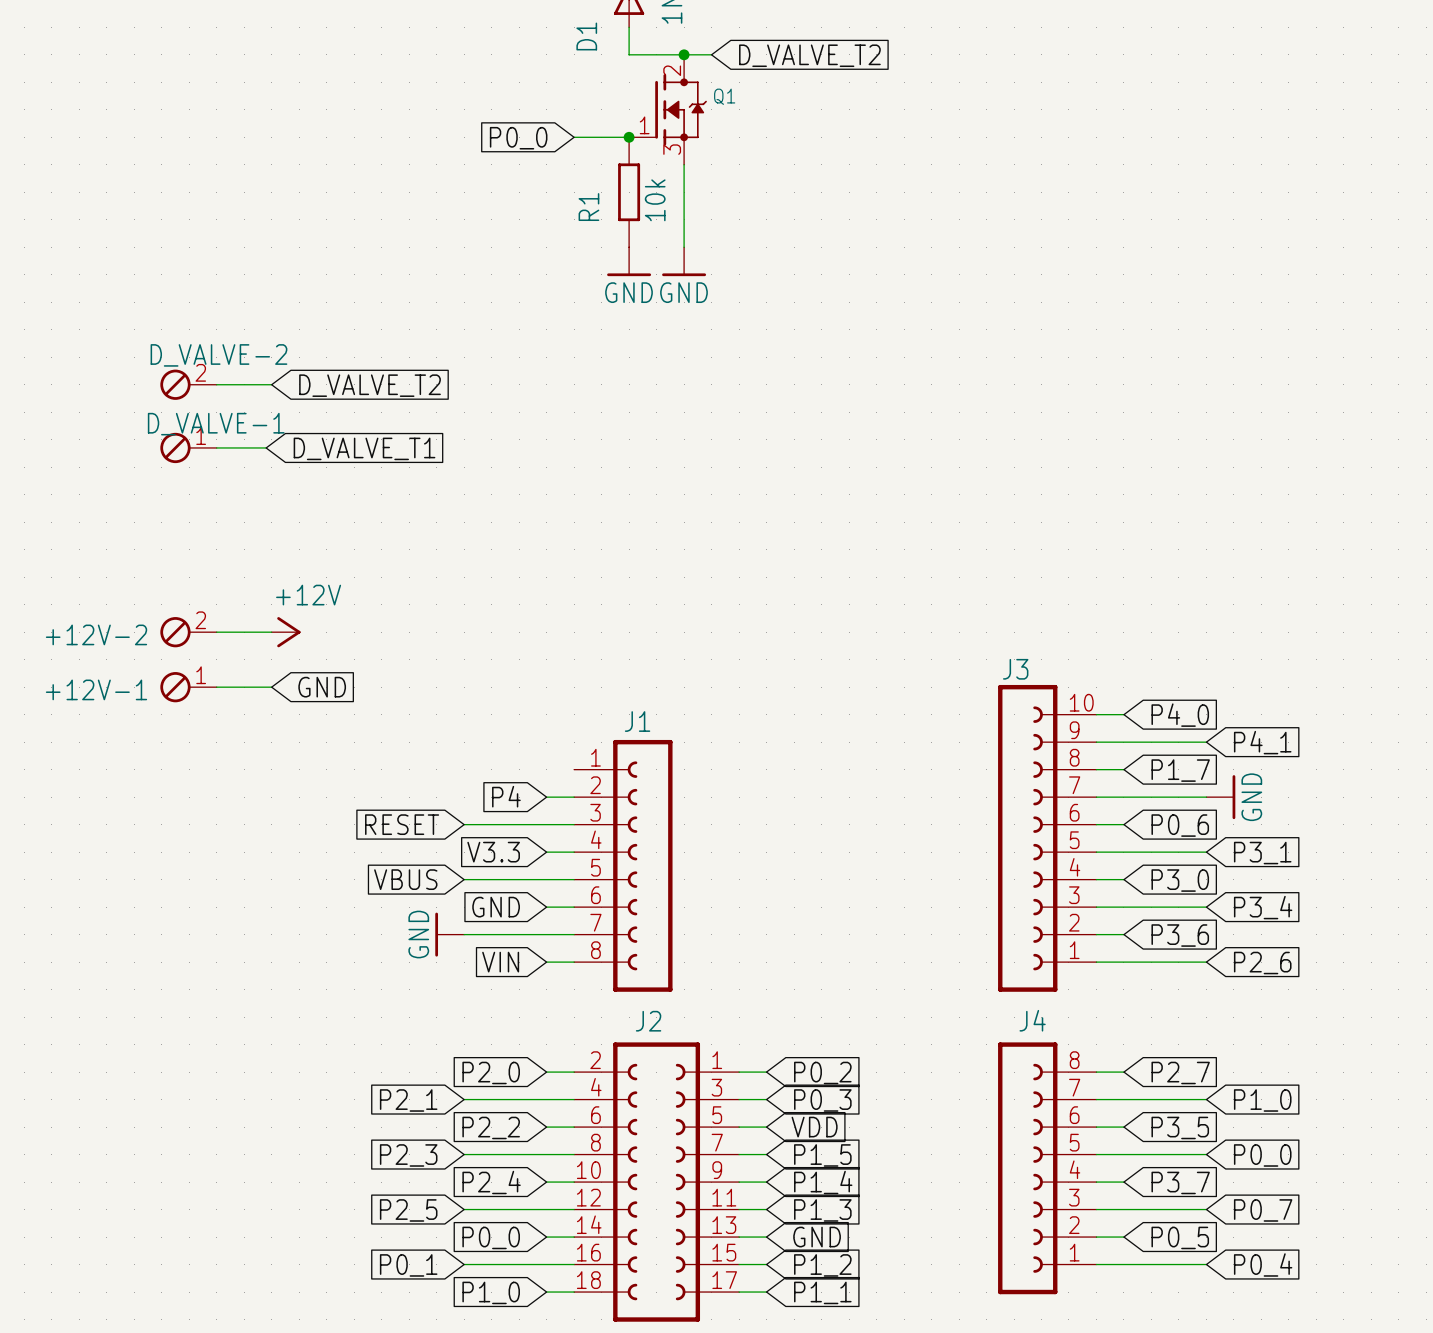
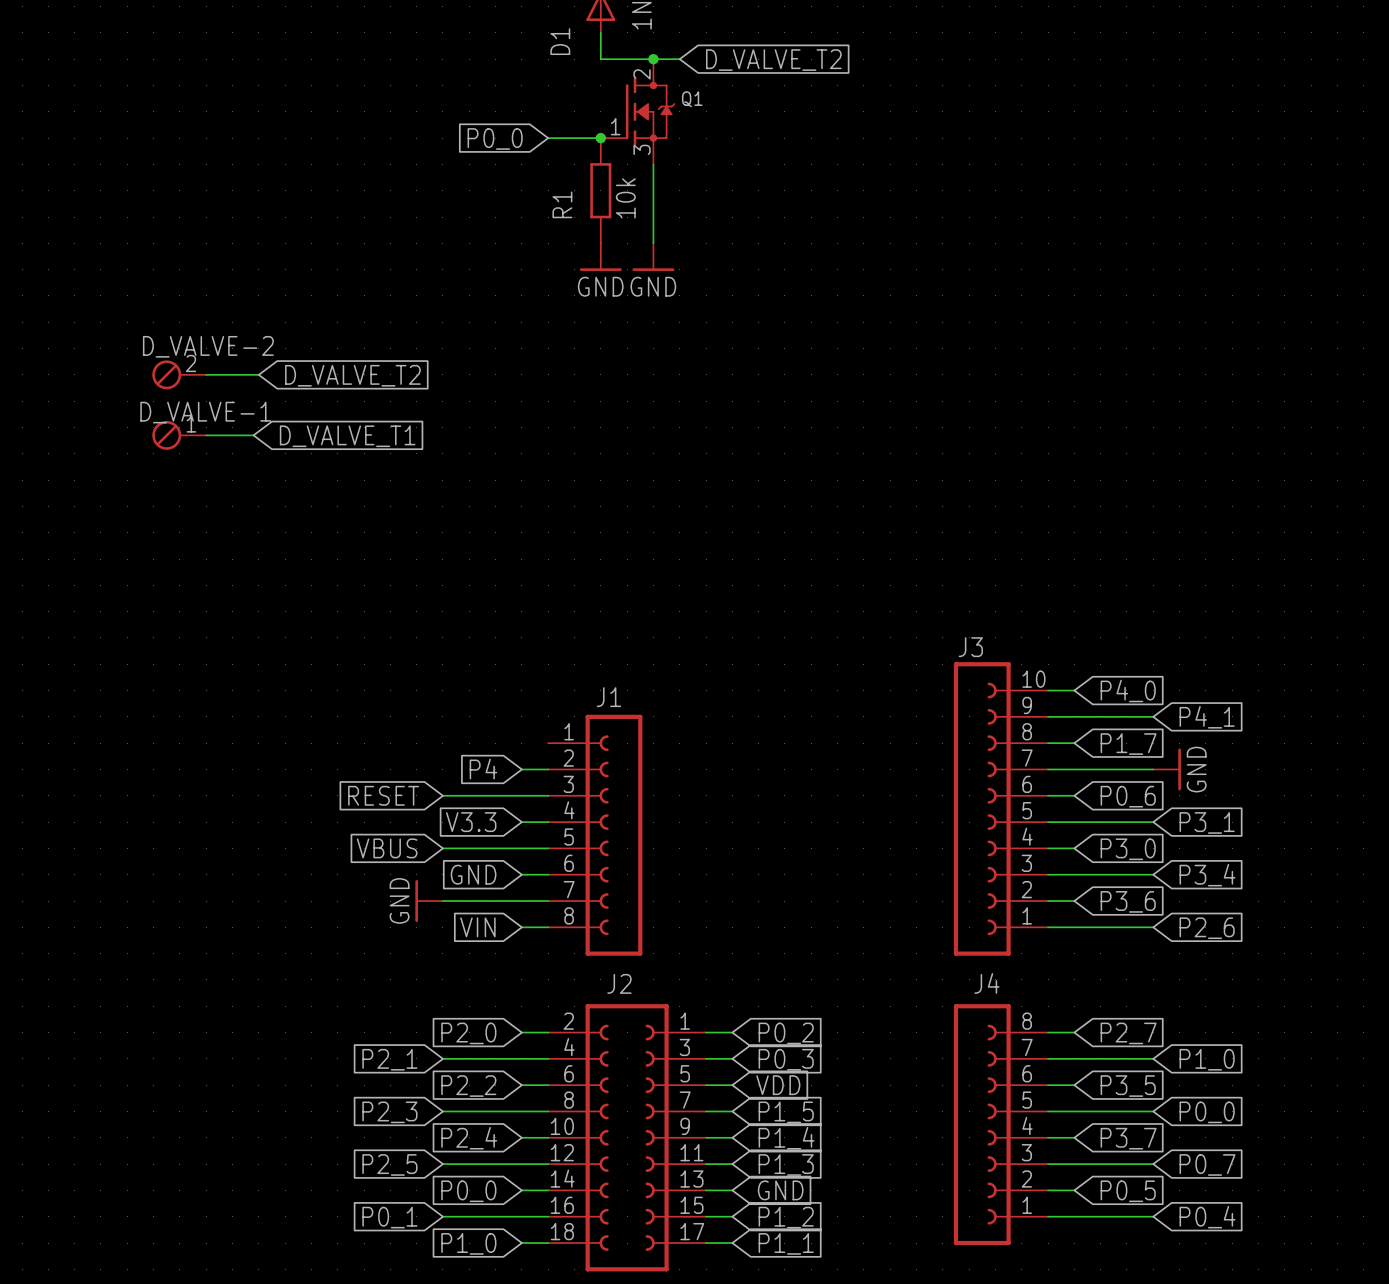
+12V-2: (188, 632) -> none
wire: (216, 632) (271, 632) -> none
power symbol: +12V (286, 632) -> none
+12V-1: (188, 687) -> none
wire: (216, 687) (271, 687) -> none
global label: GND (322, 687) -> none

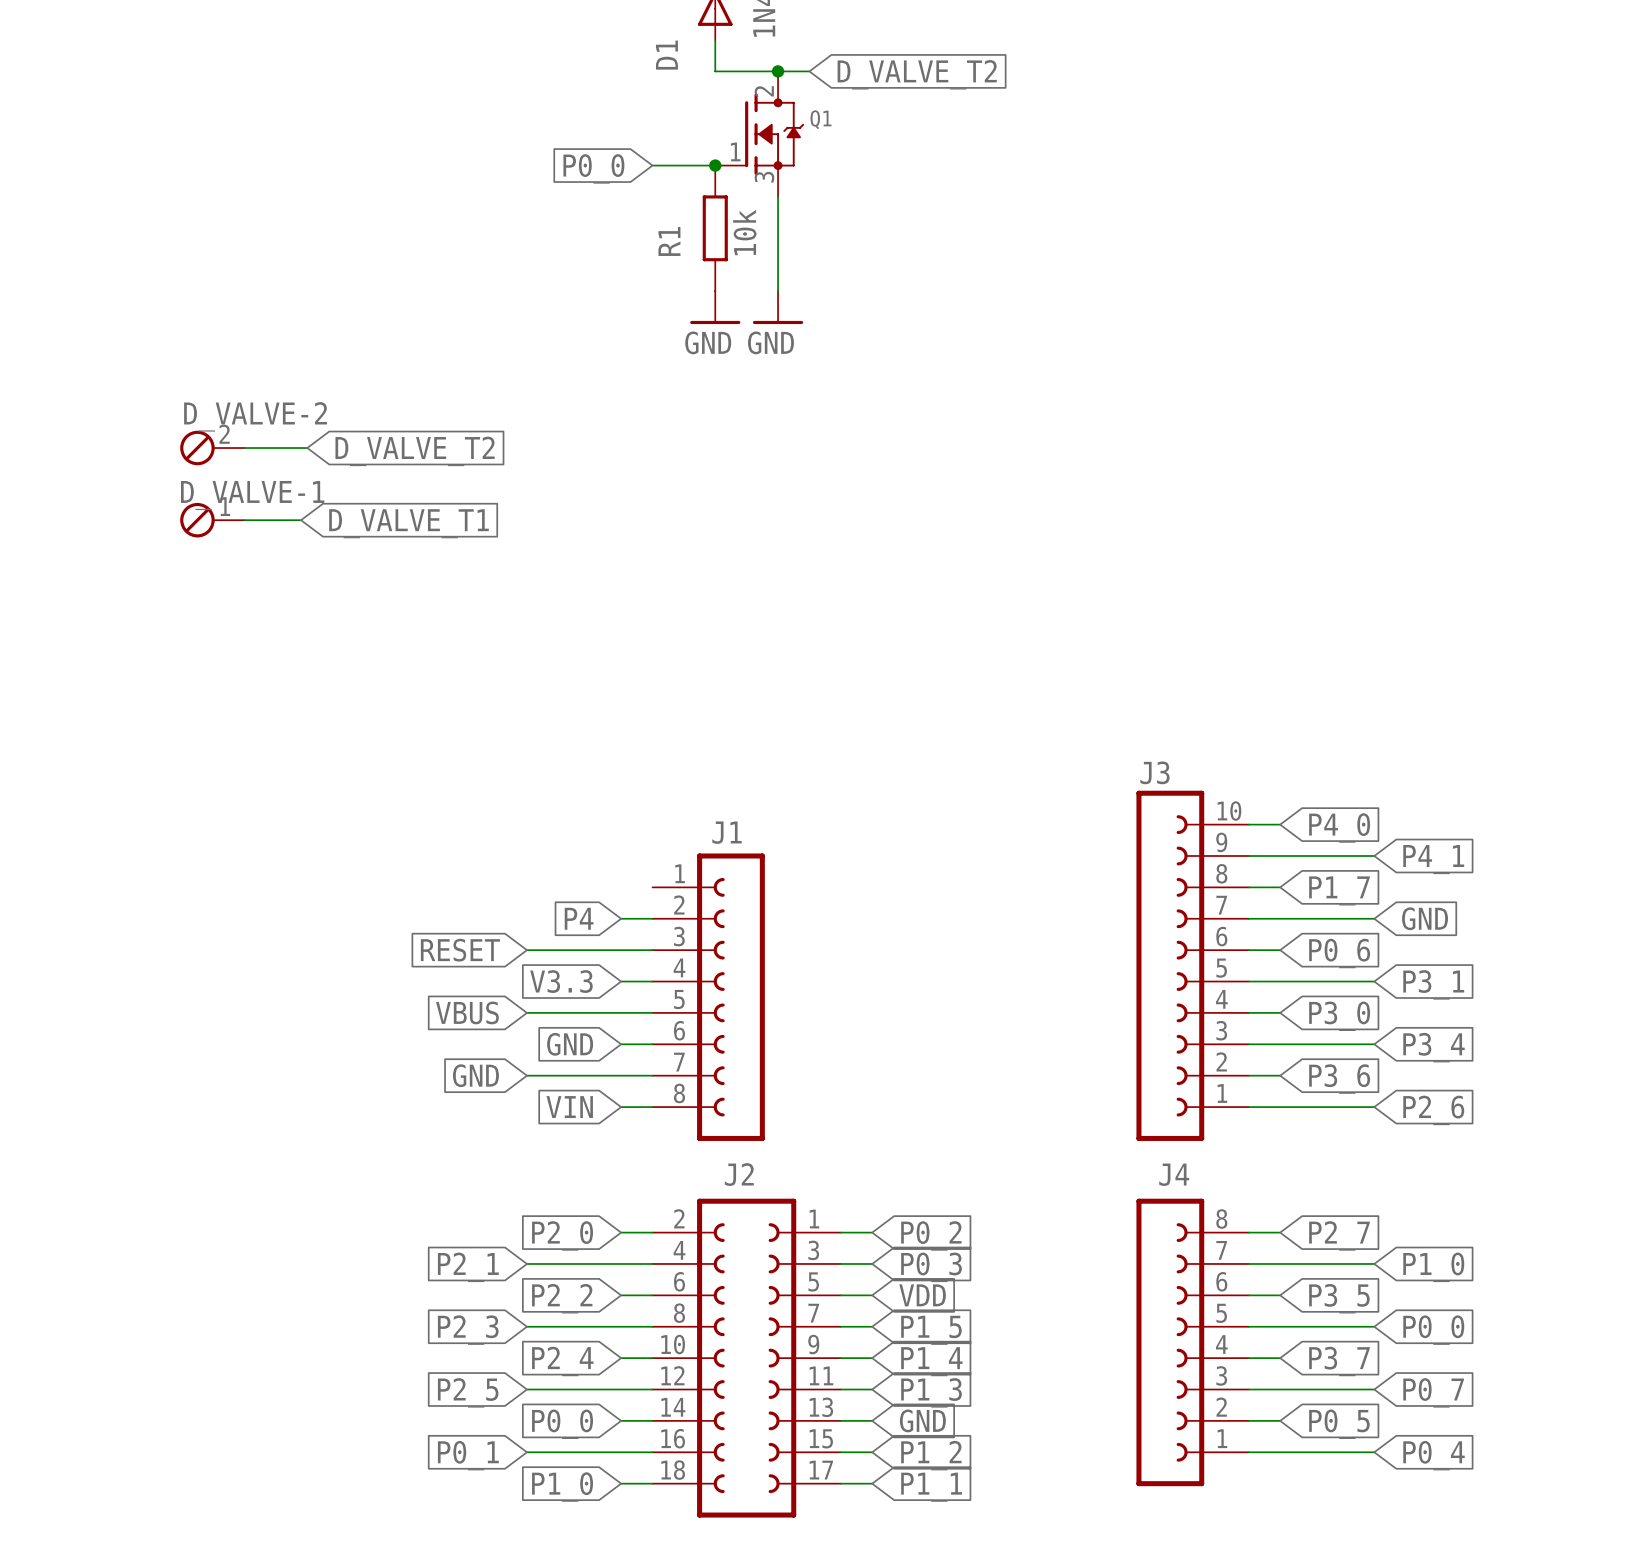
power symbol: GND (1167, 769) -> none
global label: none -> GND (1425, 918)
global label: none -> GND (475, 1075)
power symbol: GND (429, 901) -> none

